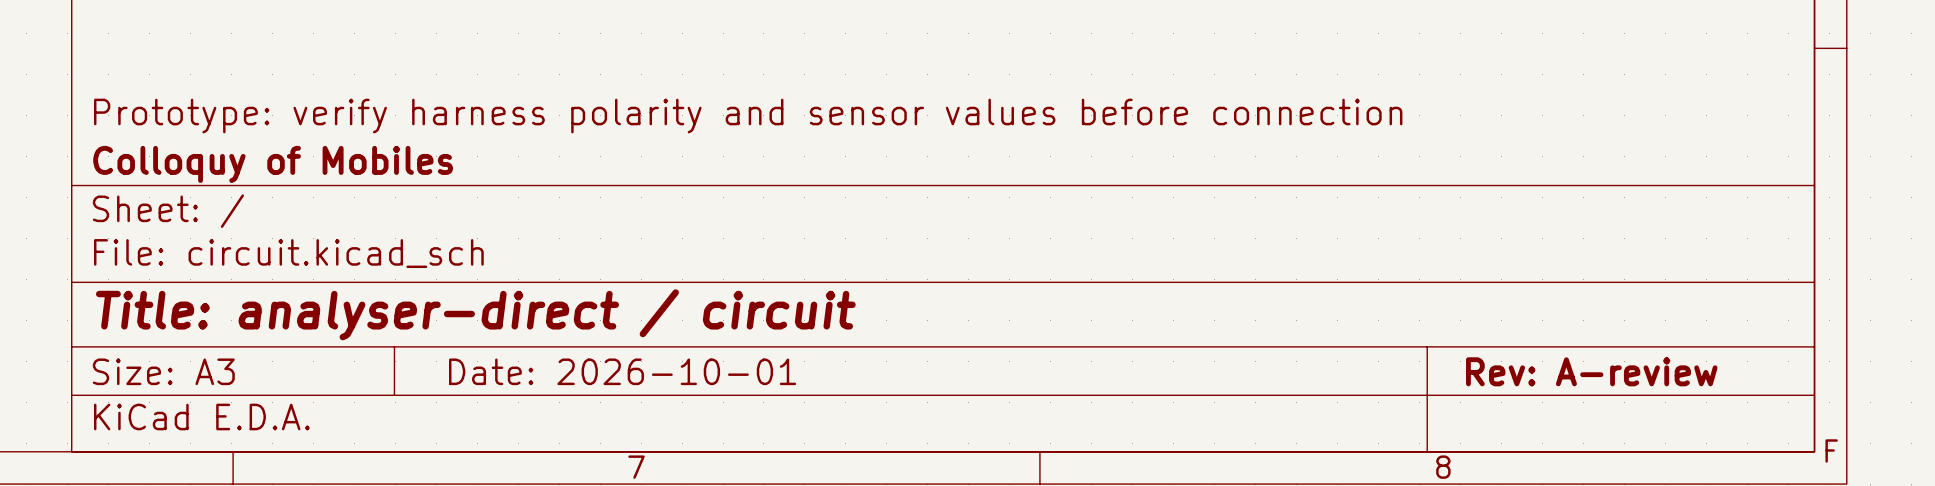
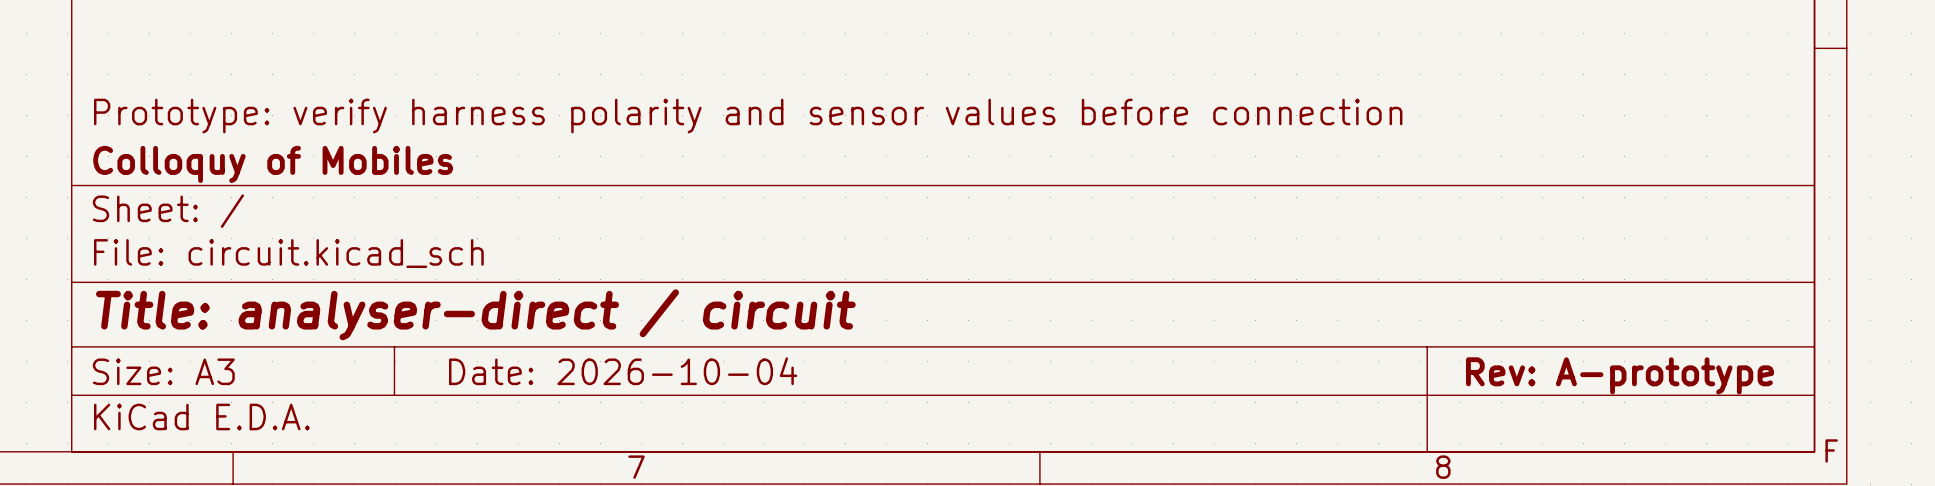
title block: Date: 2026-10-01 (622, 371) -> Date: 2026-10-04 (623, 371)
title block: Rev: A-review (1591, 371) -> Rev: A-prototype (1620, 375)

